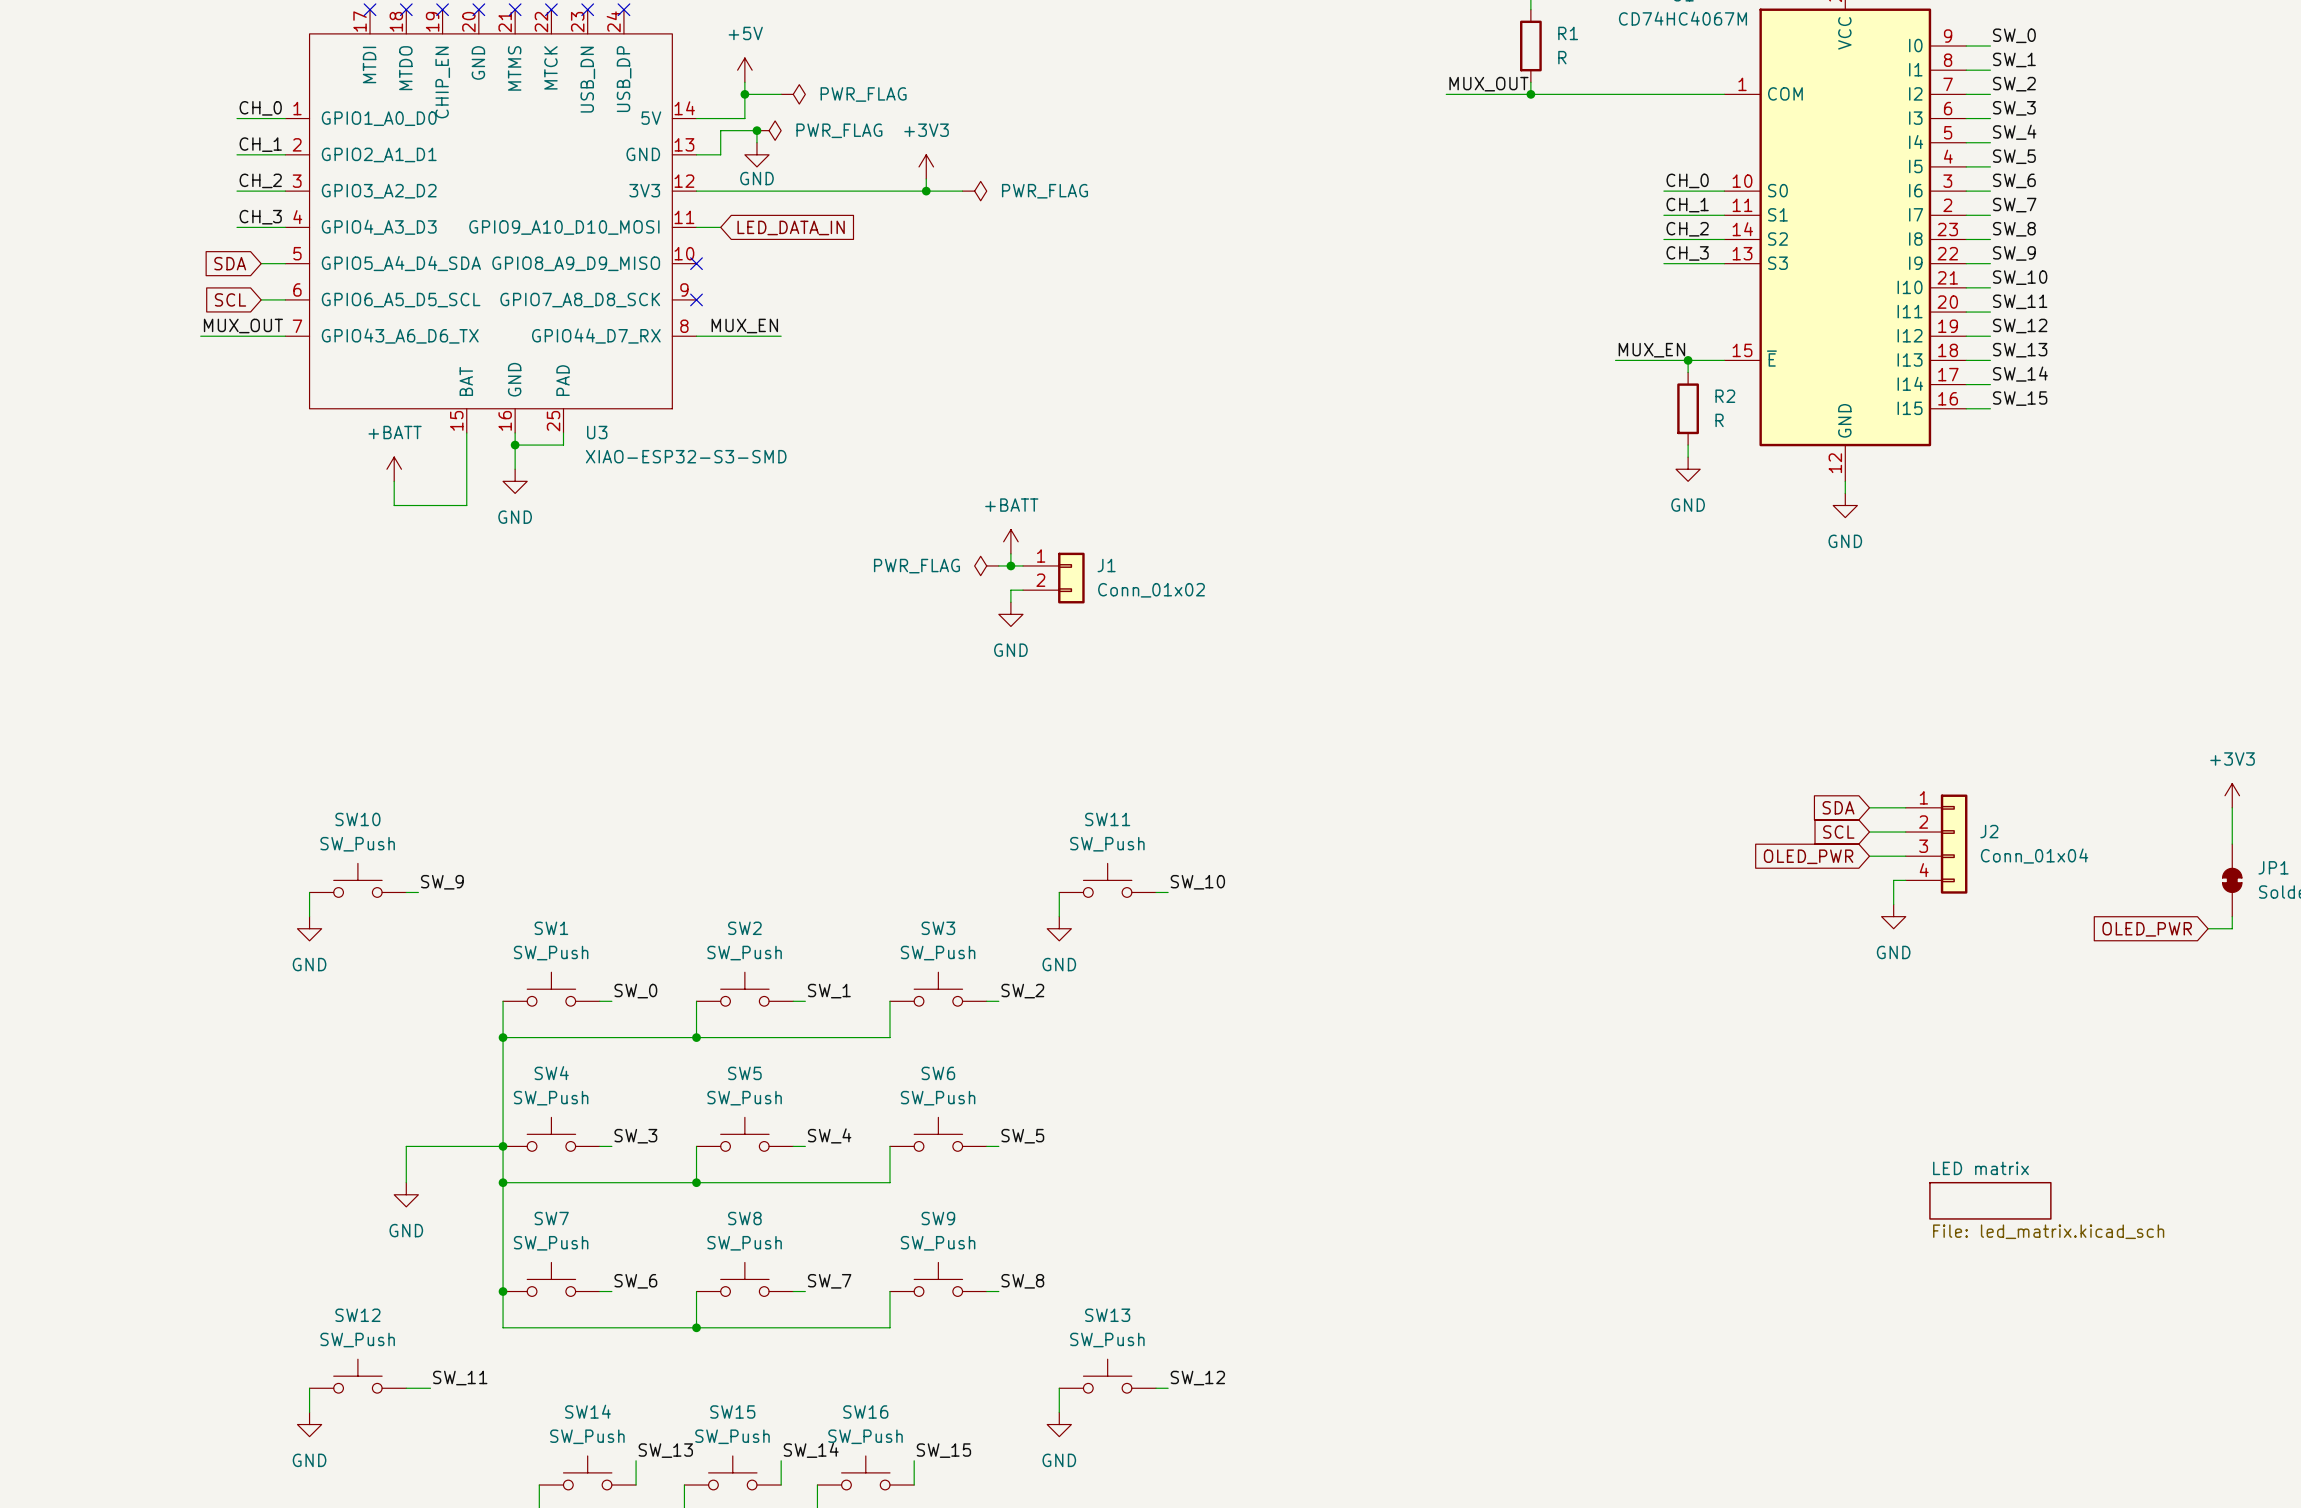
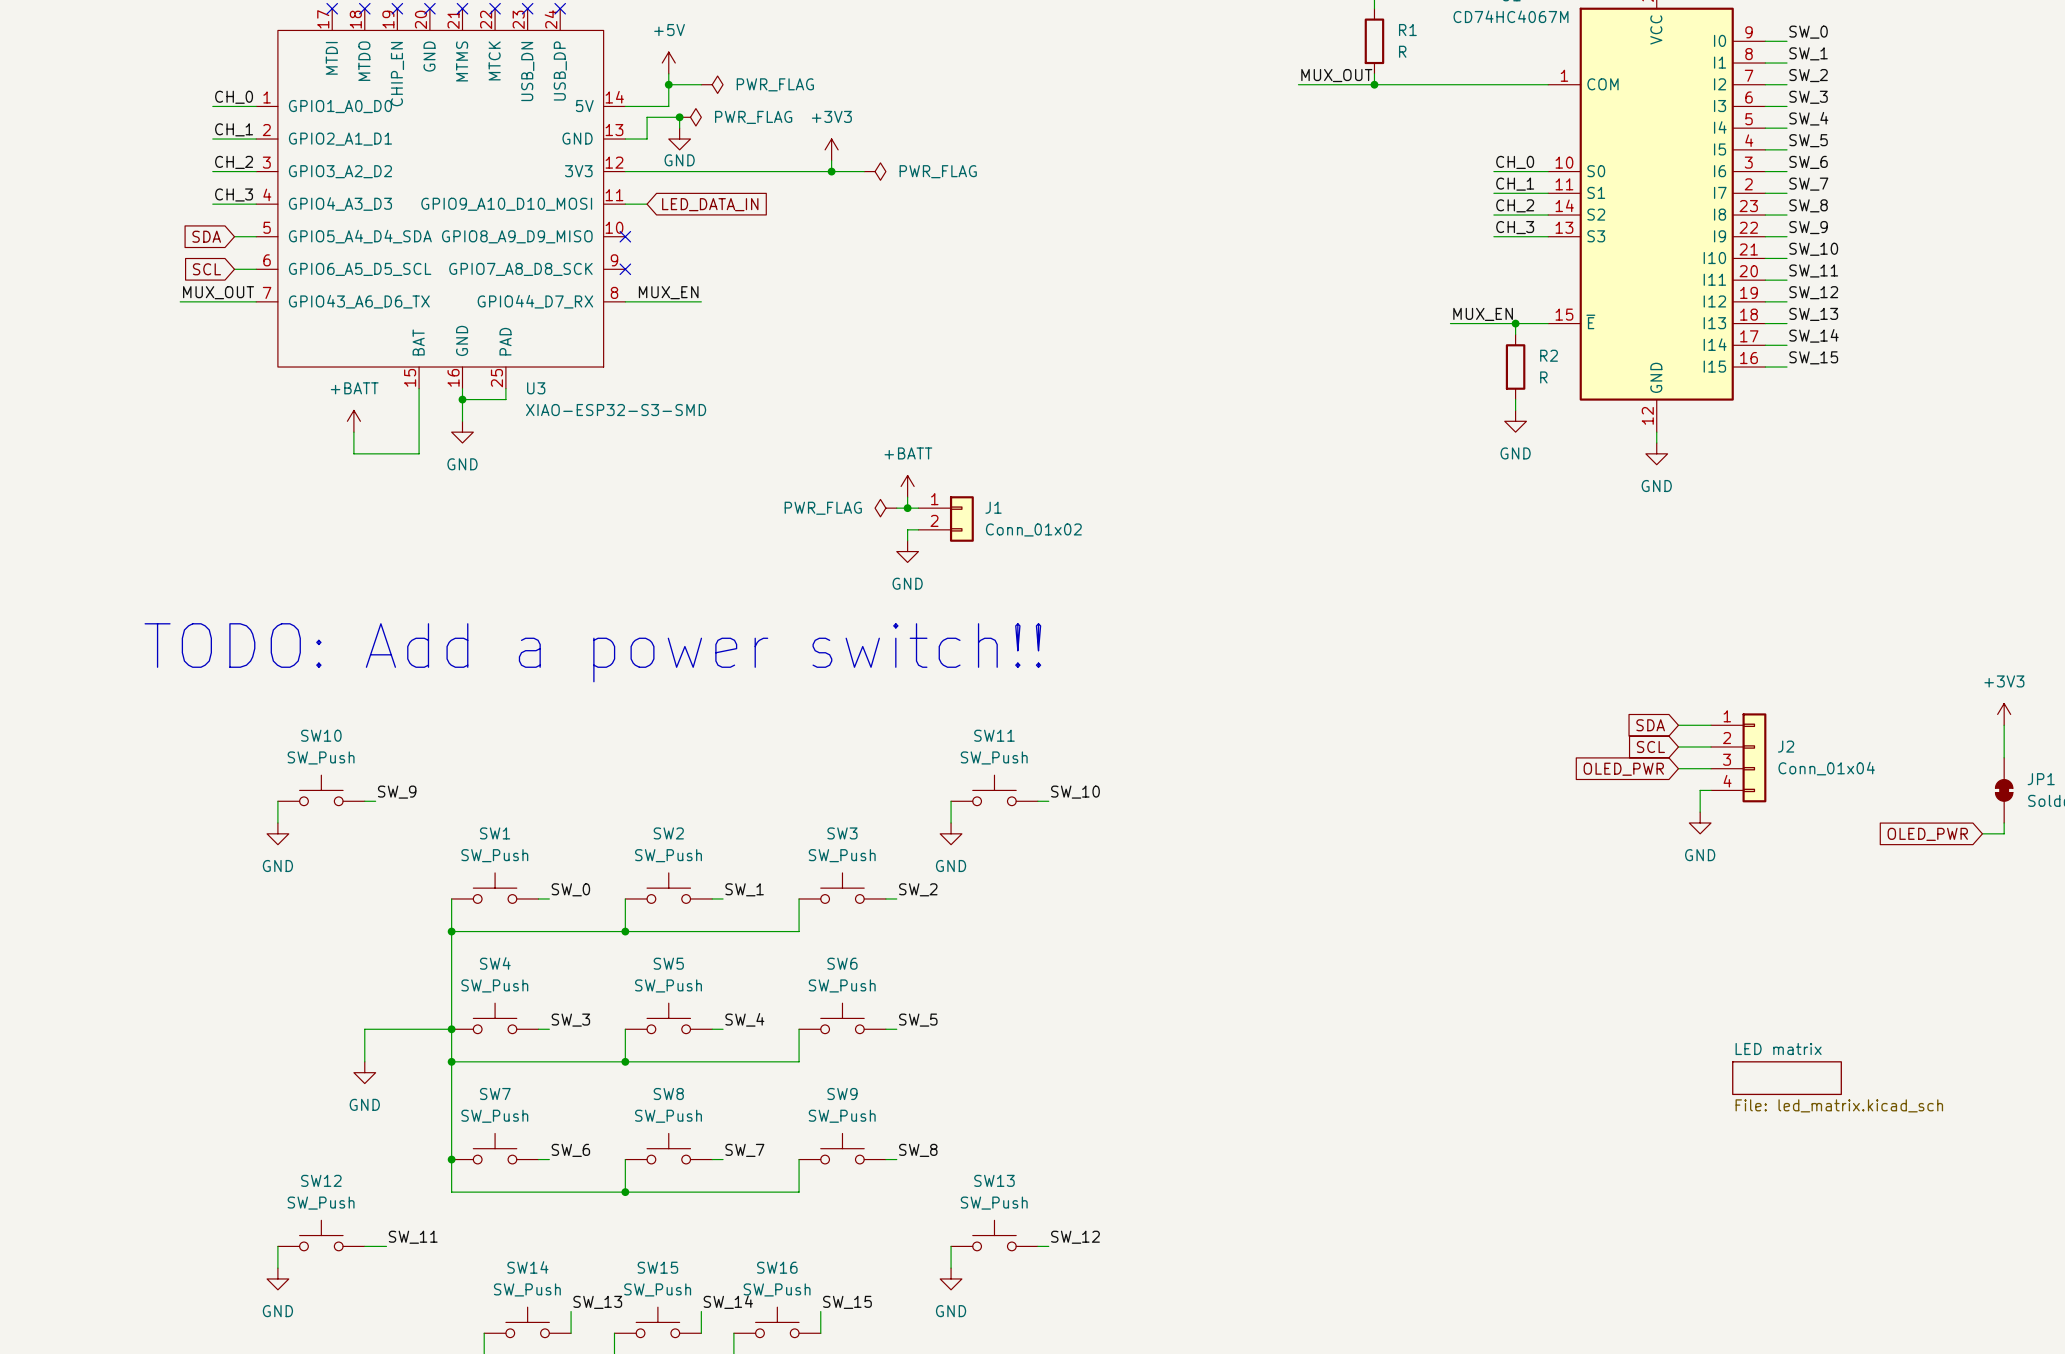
text: none -> TODO: Add a power switch!! (592, 652)

